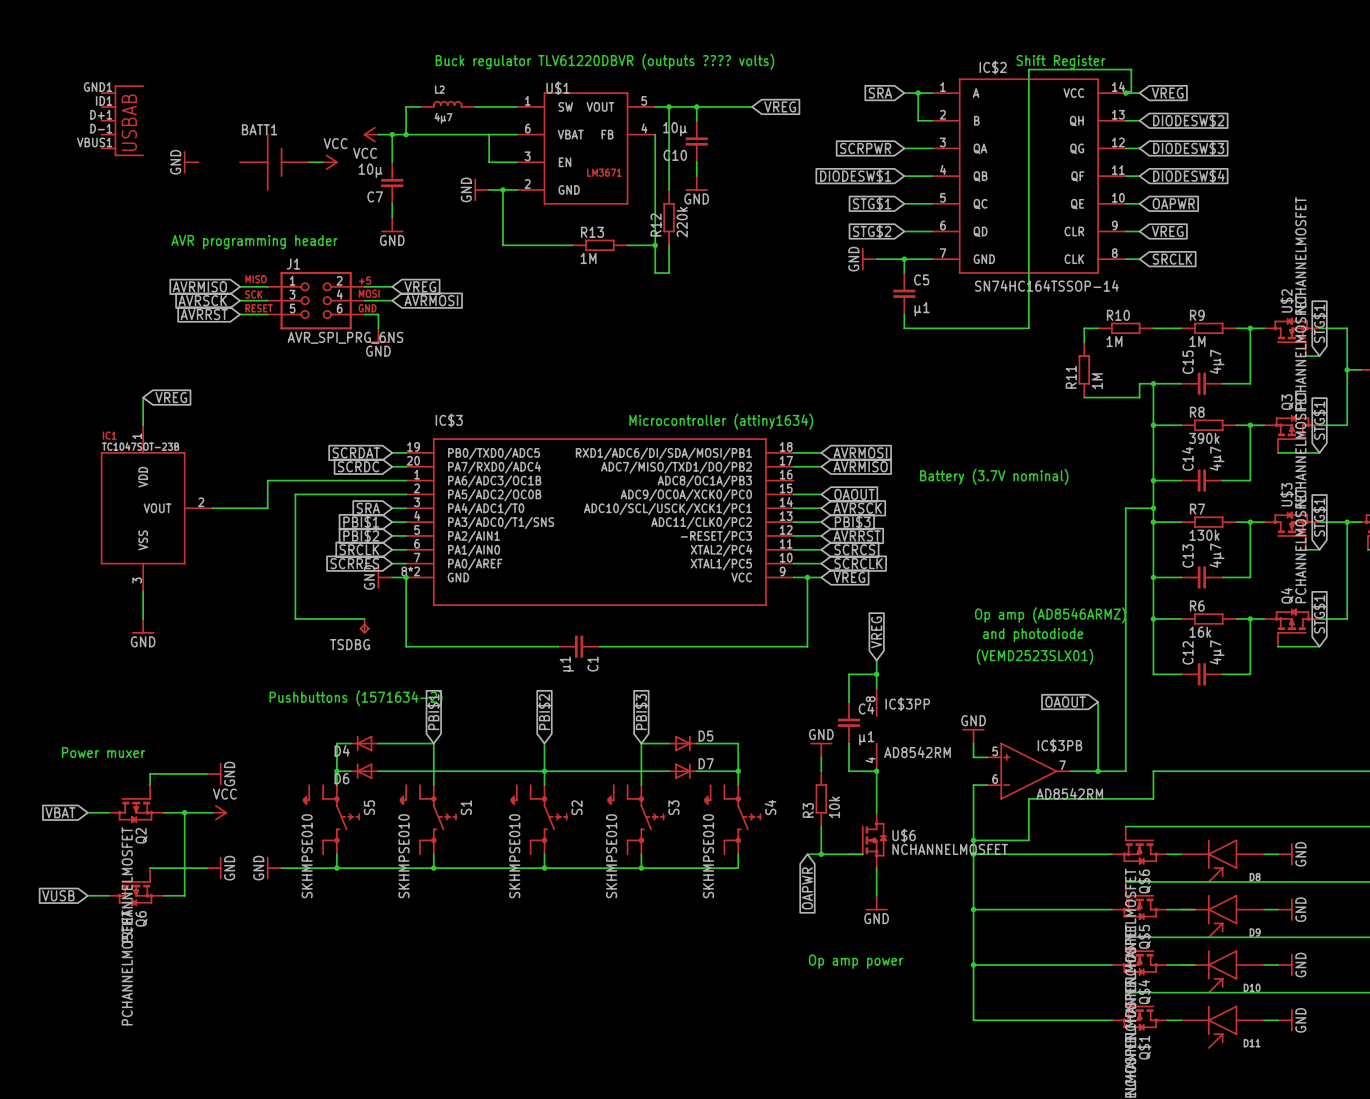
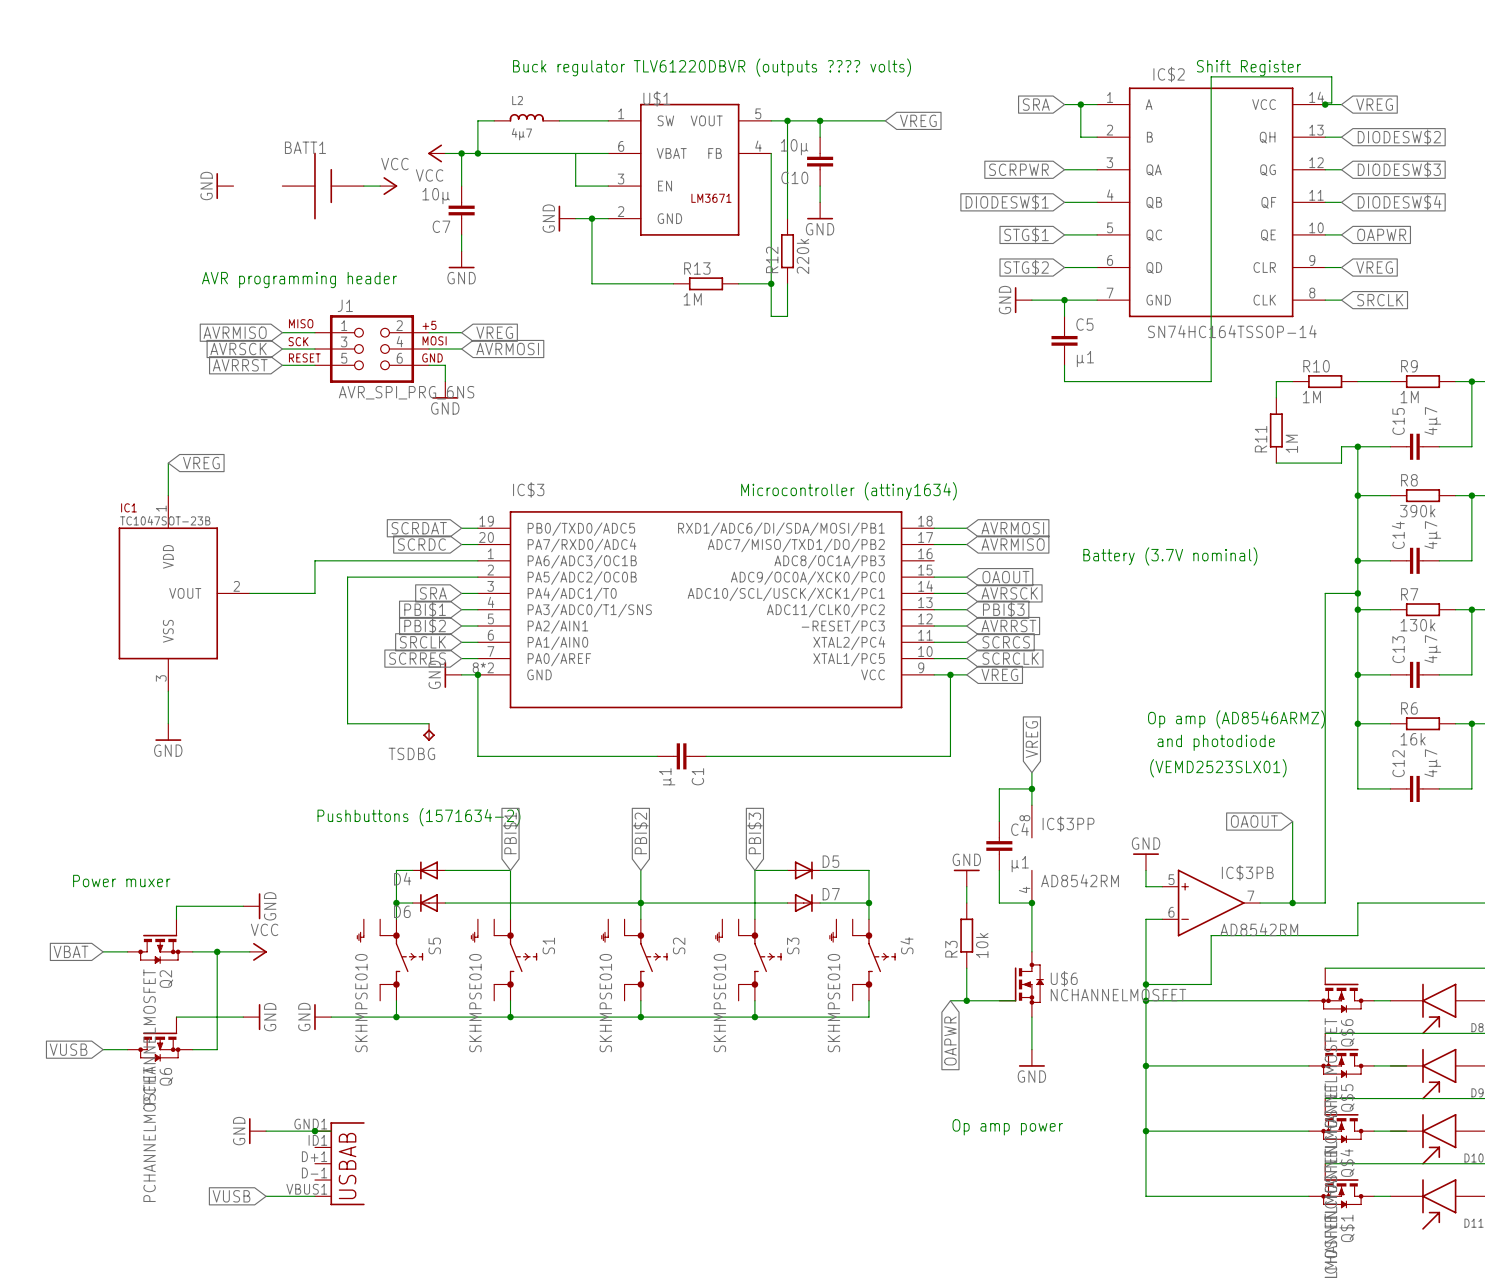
part: (122, 120) -> none
power symbol: none -> GND (257, 1131)
wire: none -> (266, 1131) (331, 1131)
junction: none -> (314, 1131)
part: none -> (339, 1163)
global label: none -> VUSB (231, 1196)
wire: none -> (266, 1196) (314, 1196)

